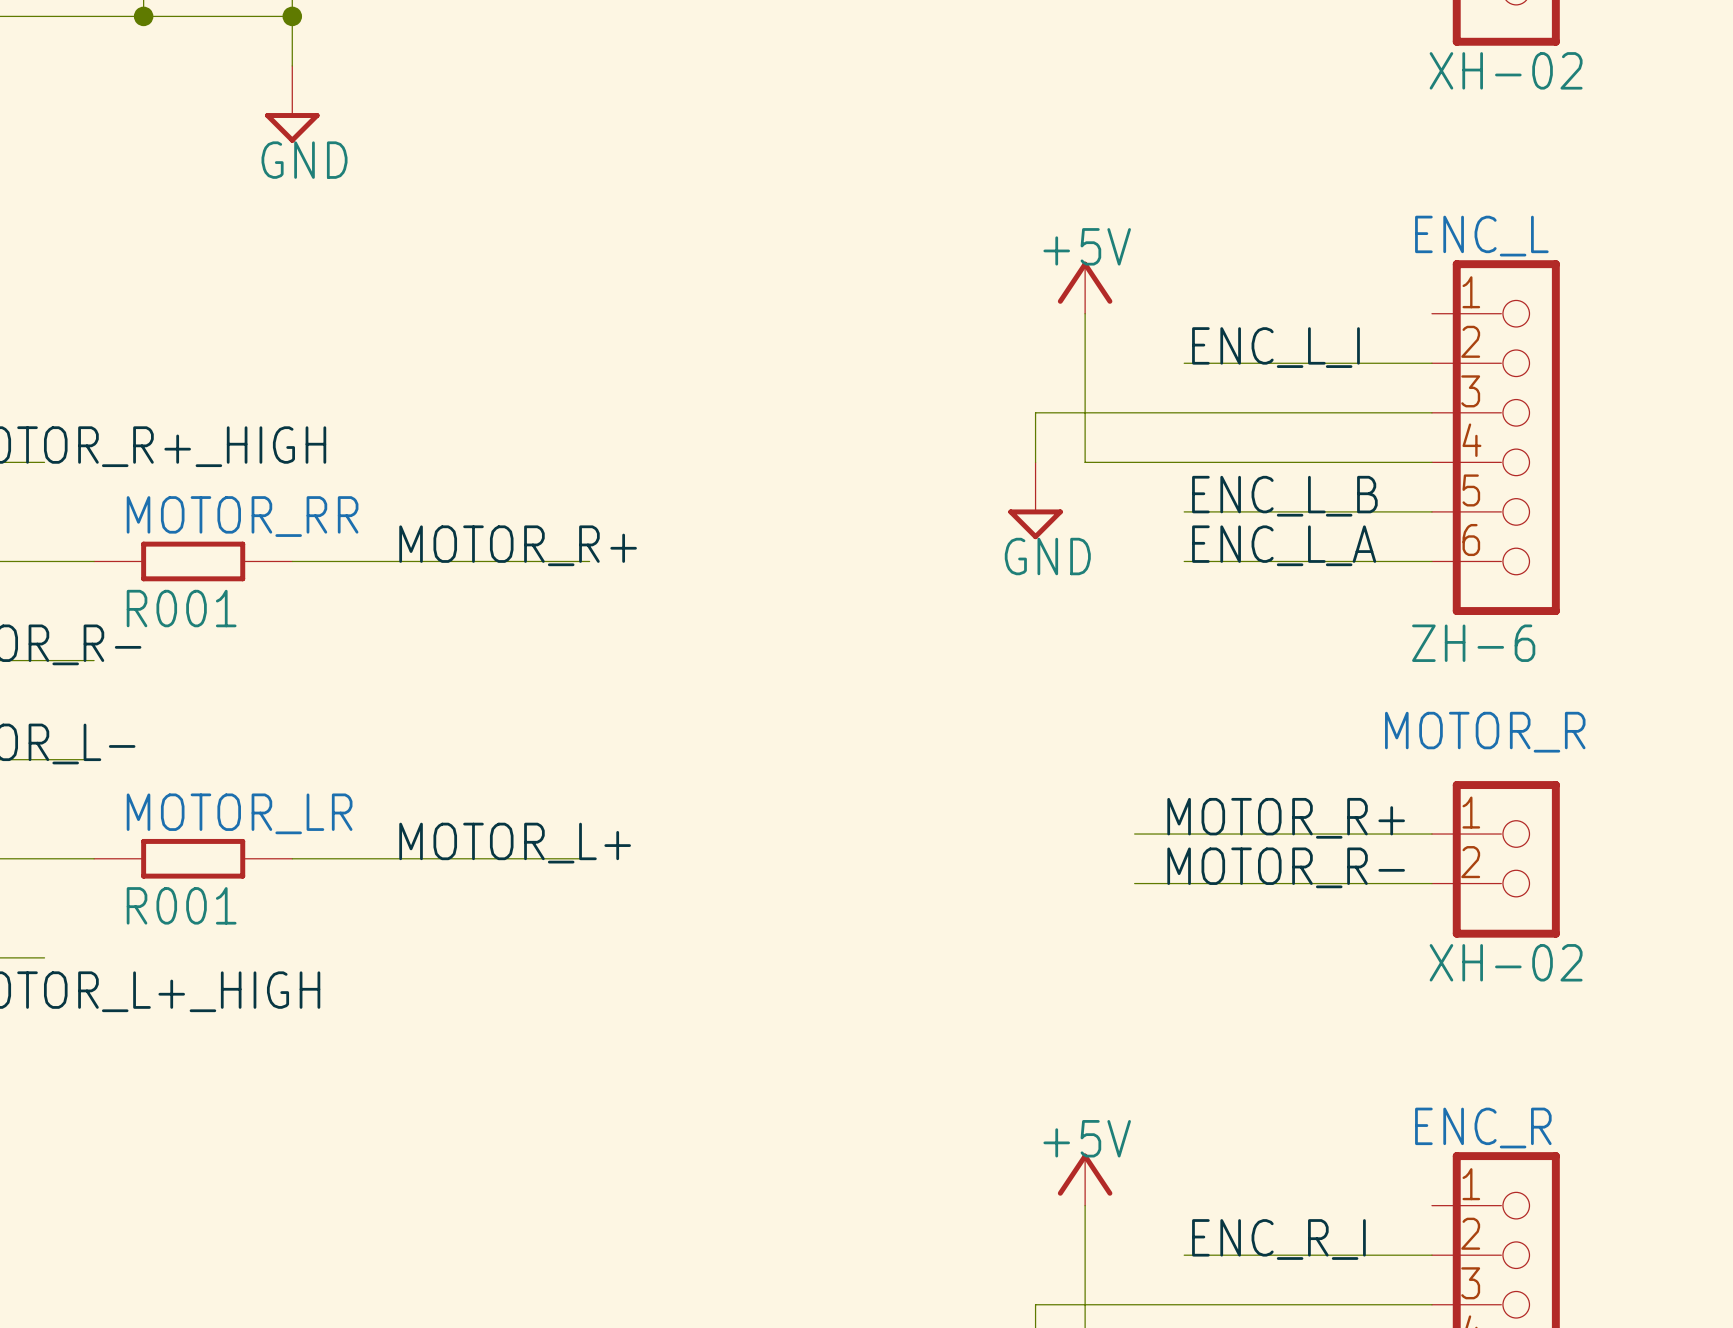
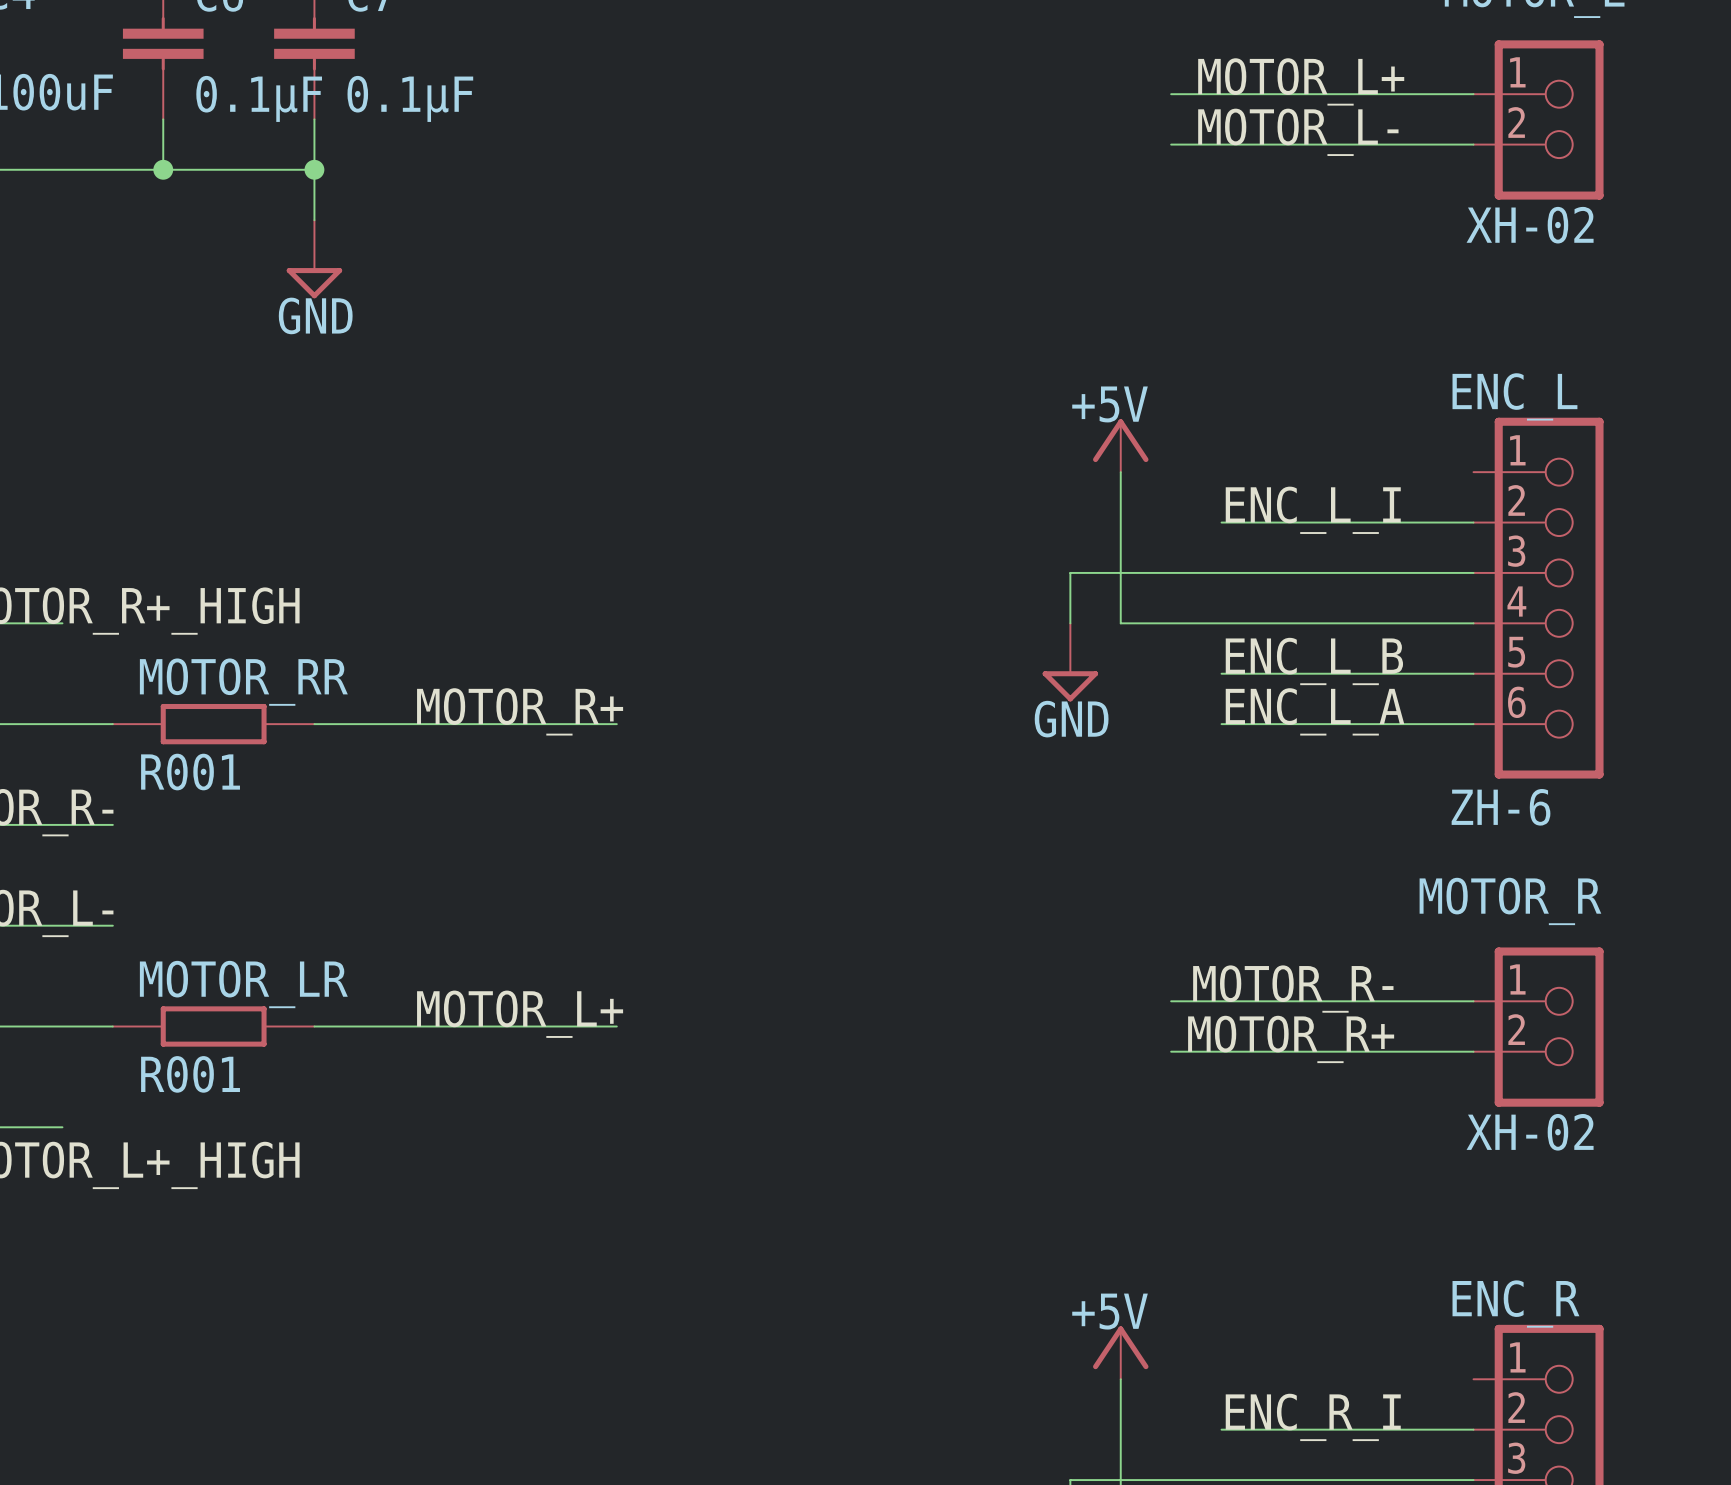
label position: MOTOR_R+ (1286, 818) -> MOTOR_R+ (1291, 1039)
label position: MOTOR_R- (1286, 867) -> MOTOR_R- (1293, 989)

